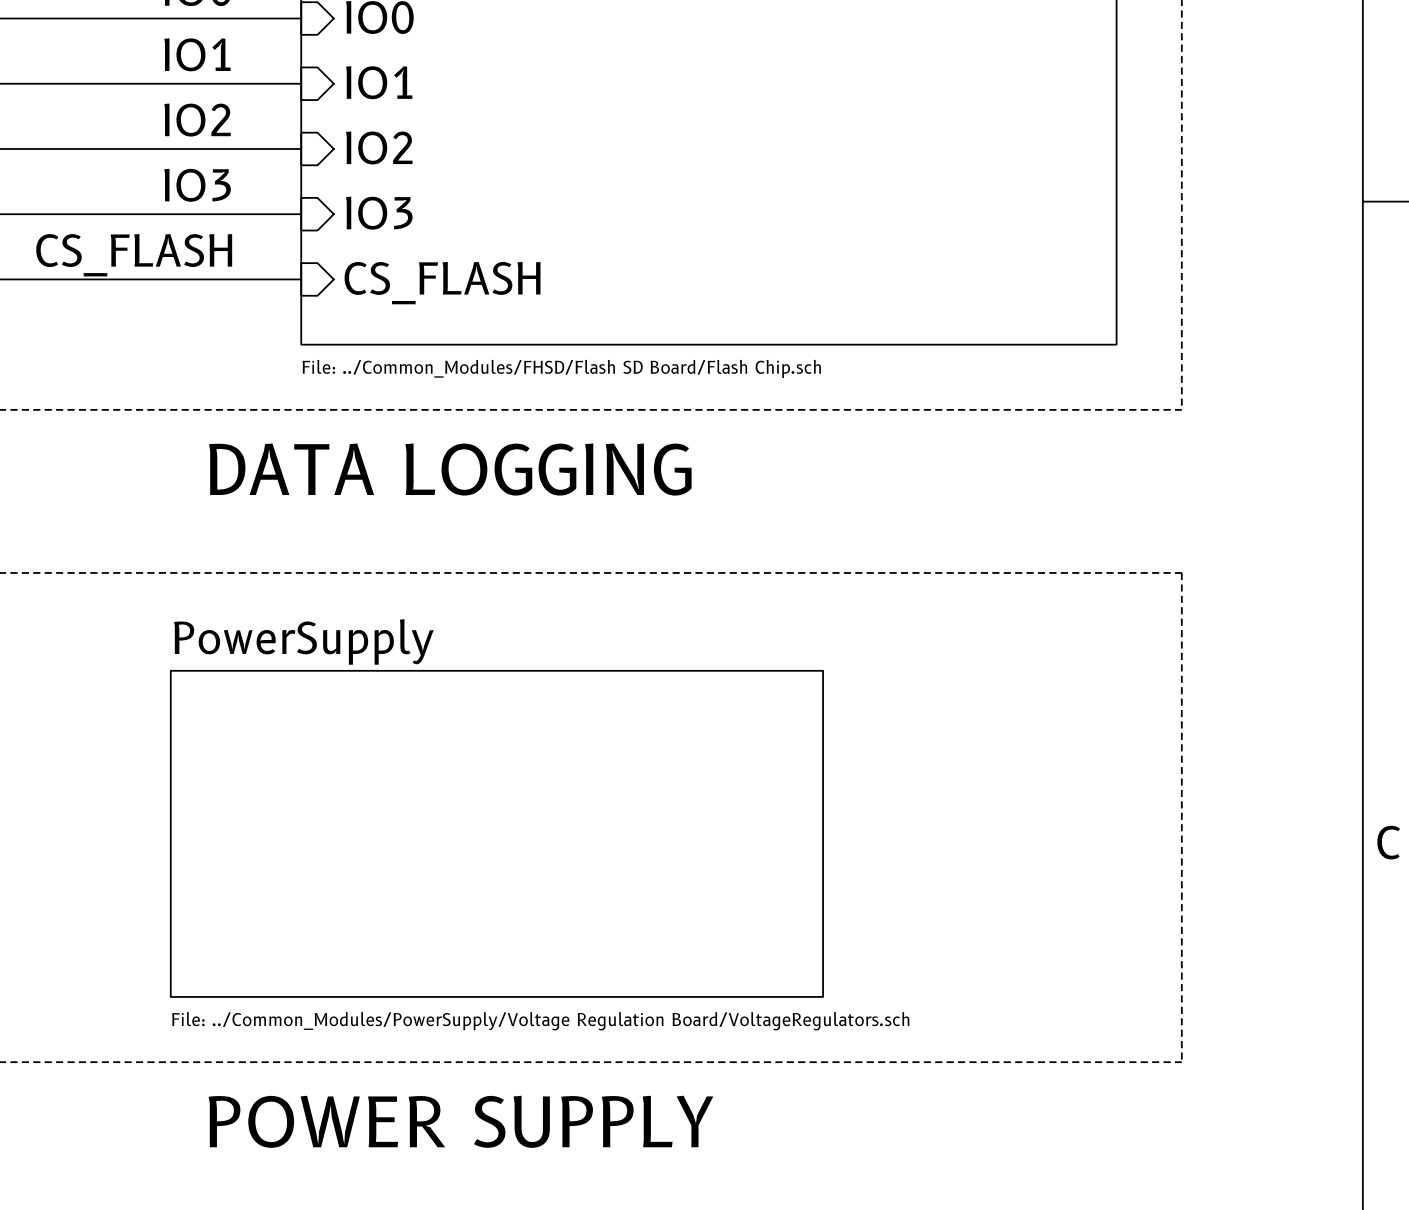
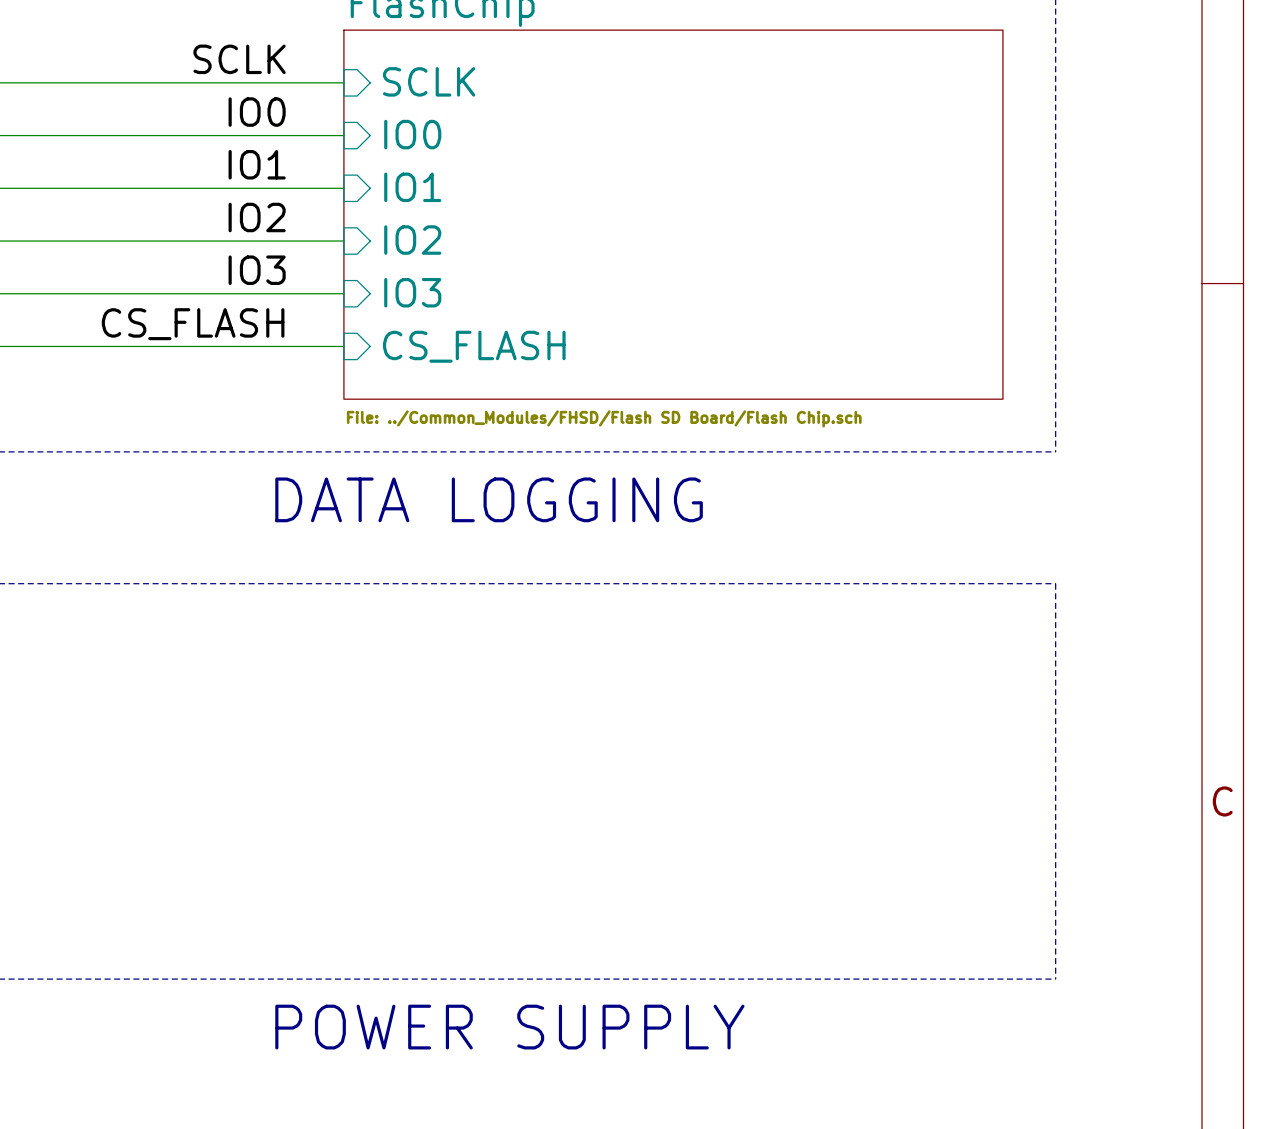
sheet PowerSupply: File: ../Common_Modules/PowerSupply/Voltage Regulation Board/VoltageRegulators.sch (496, 833) -> none

